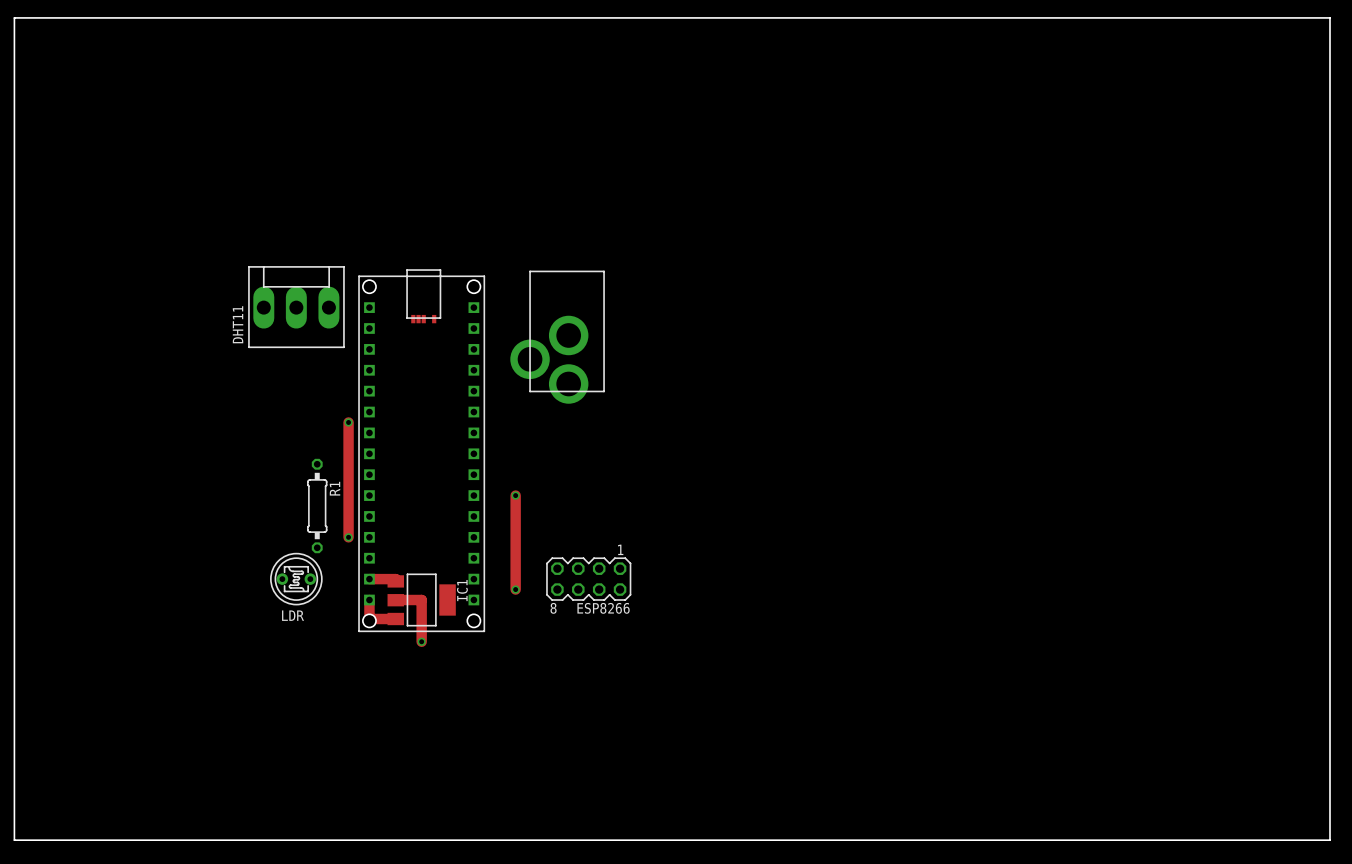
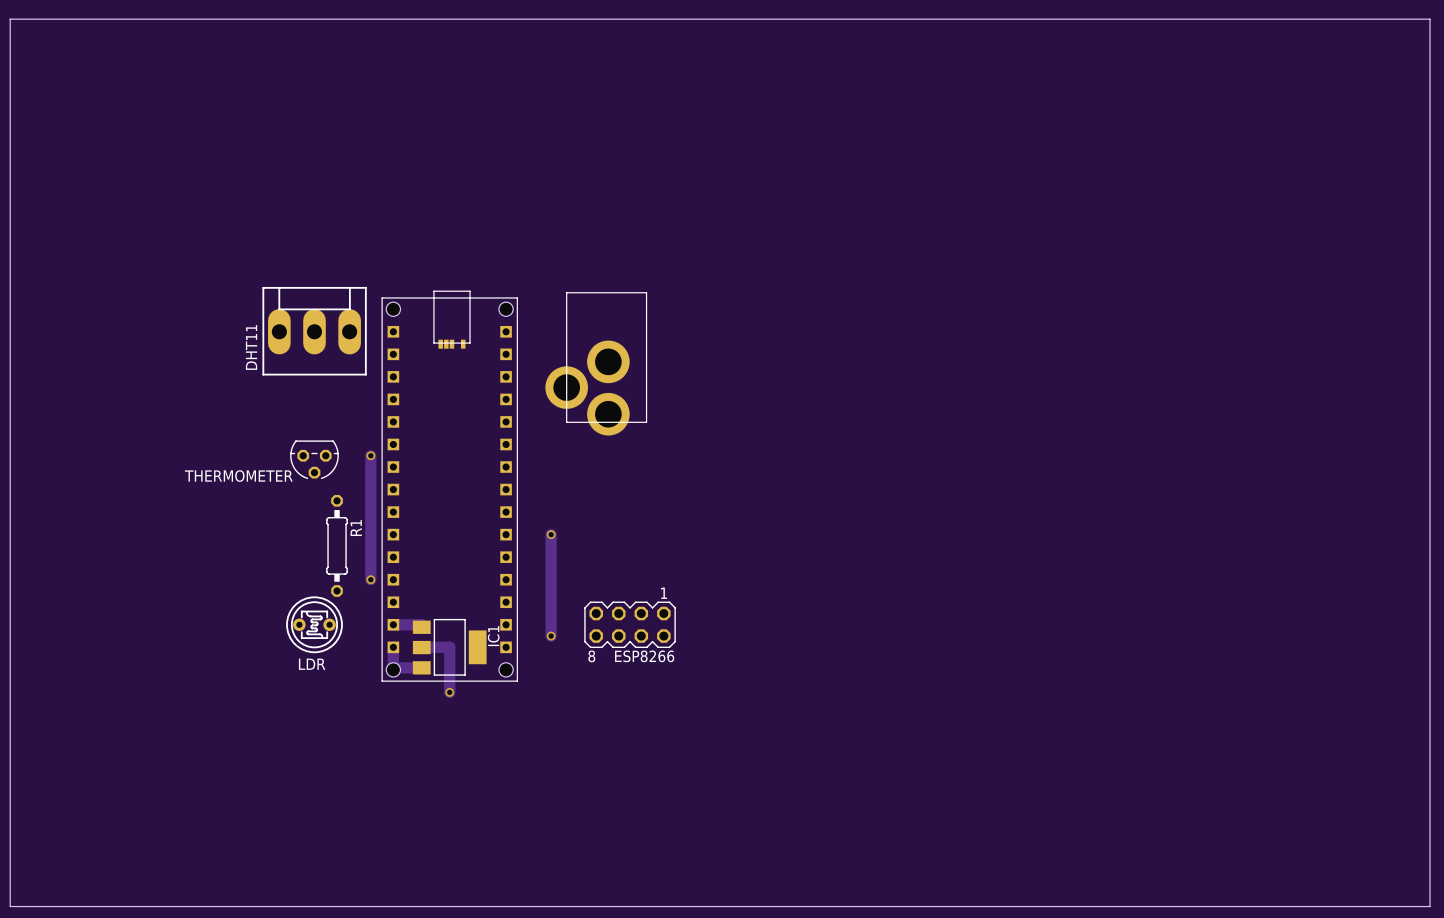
THERMOMETER: none -> (314, 459)

